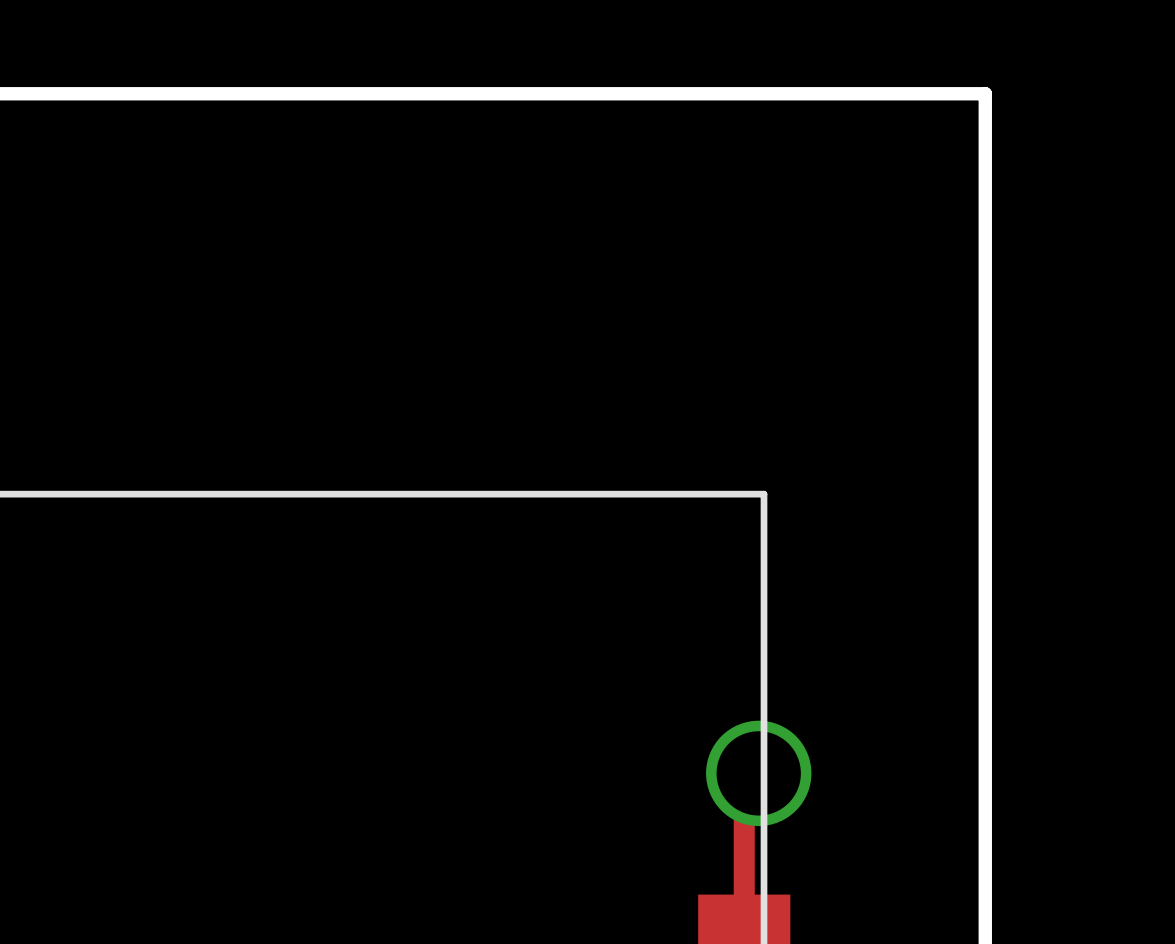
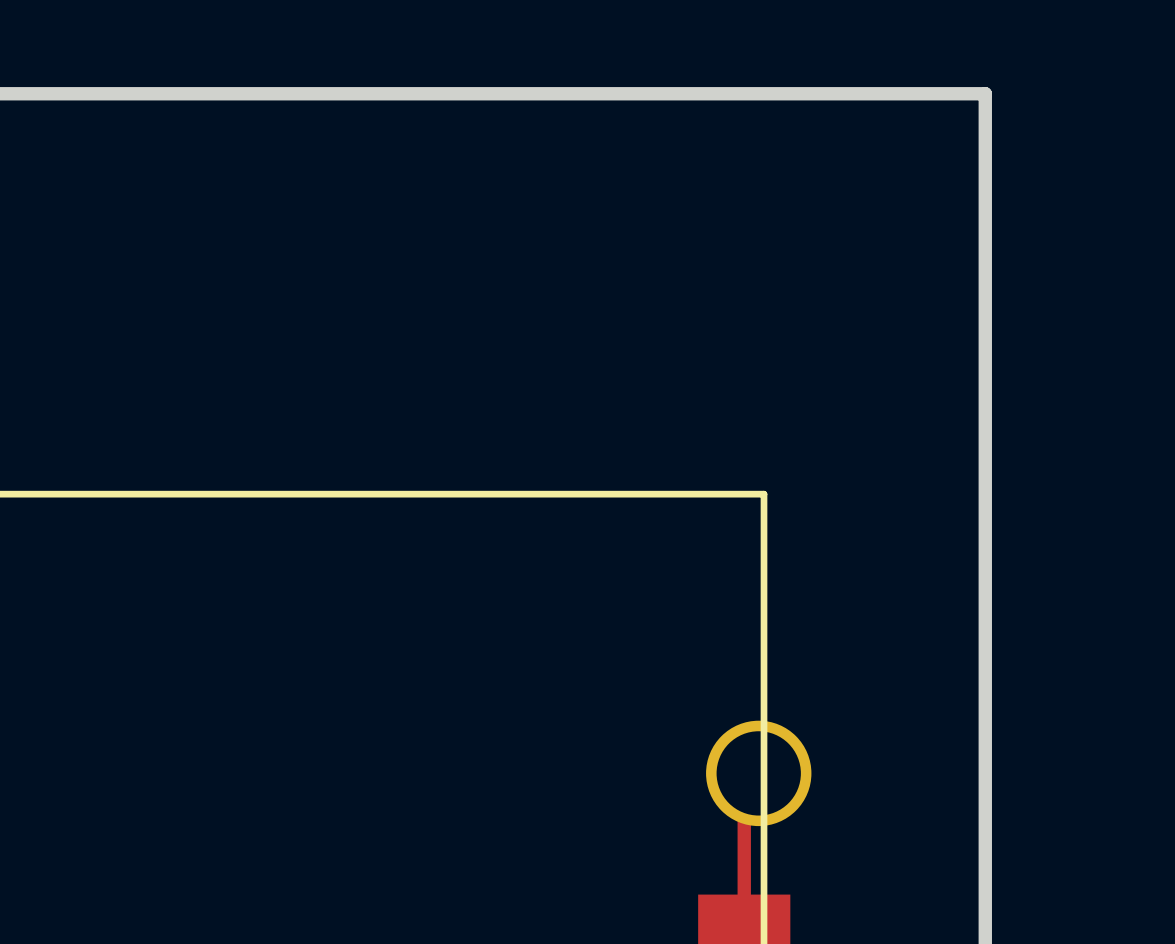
track width: thick (758, 773) (744, 787) (744, 920) -> thin (758, 773) (744, 787) (744, 920)

